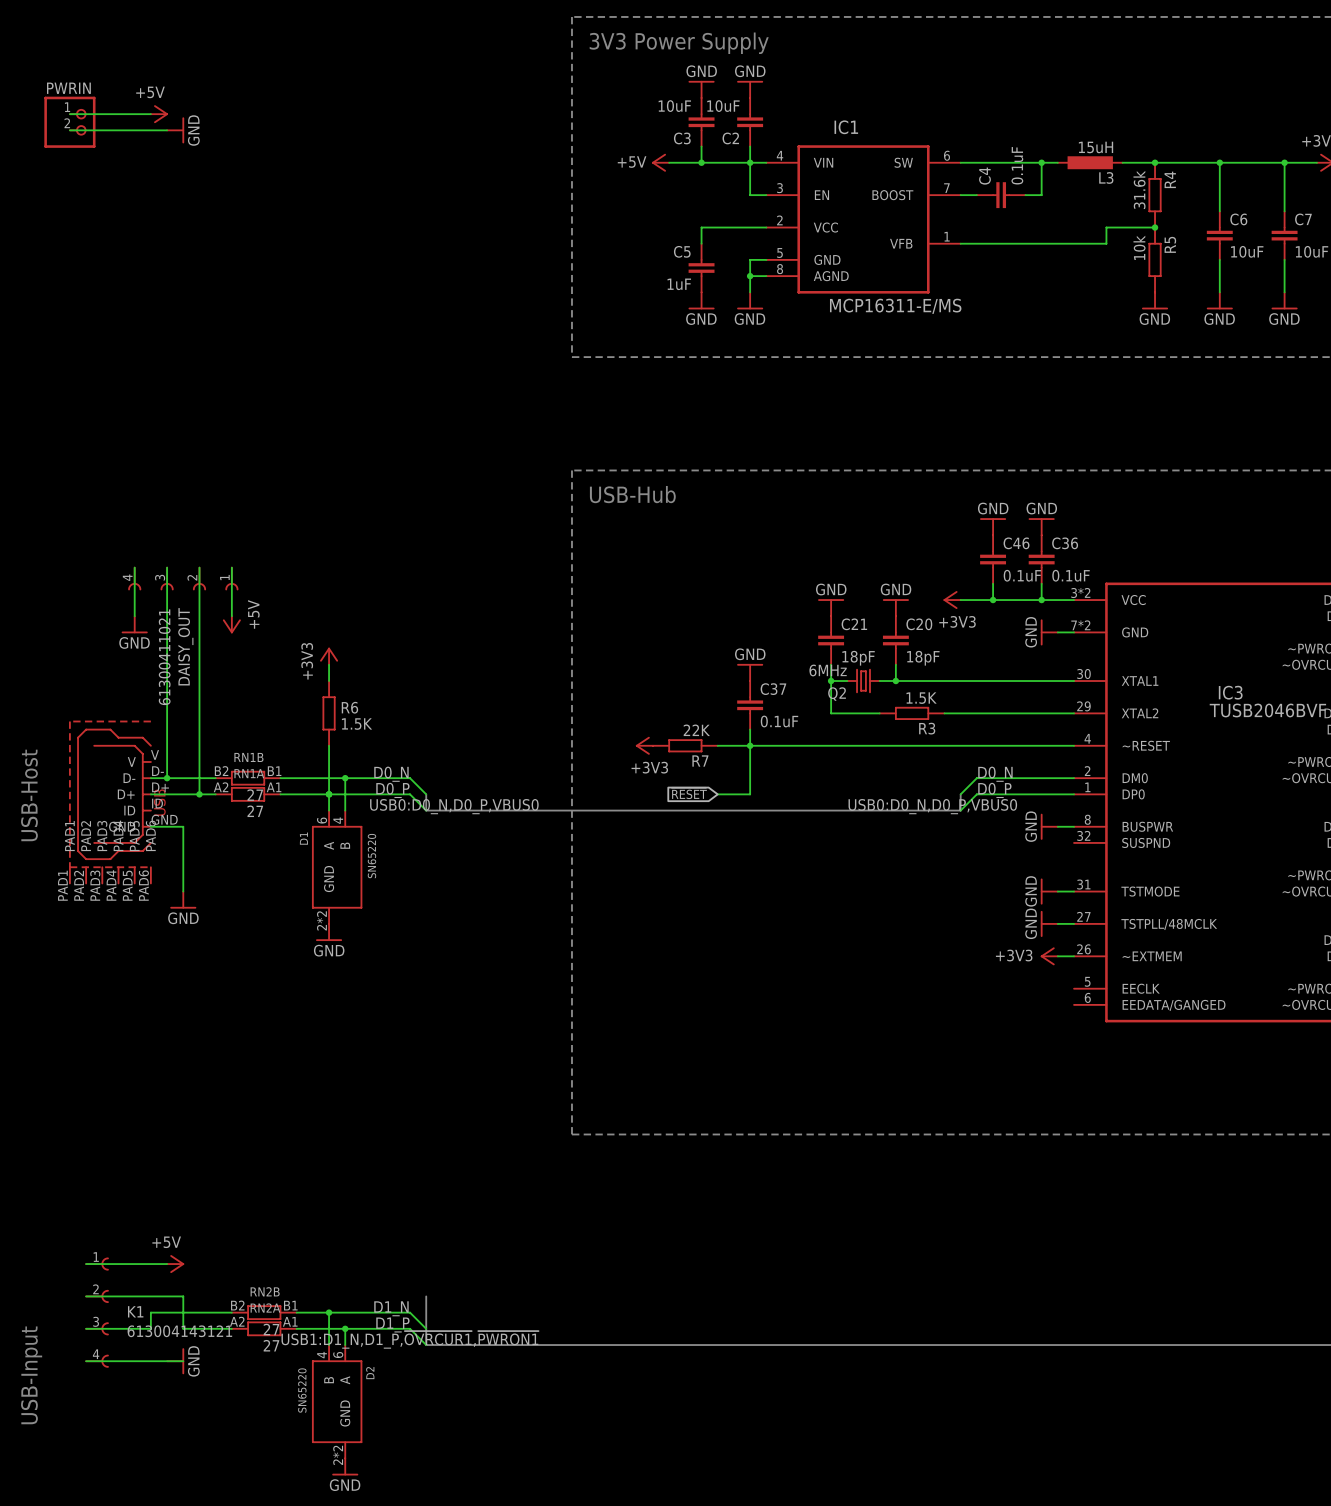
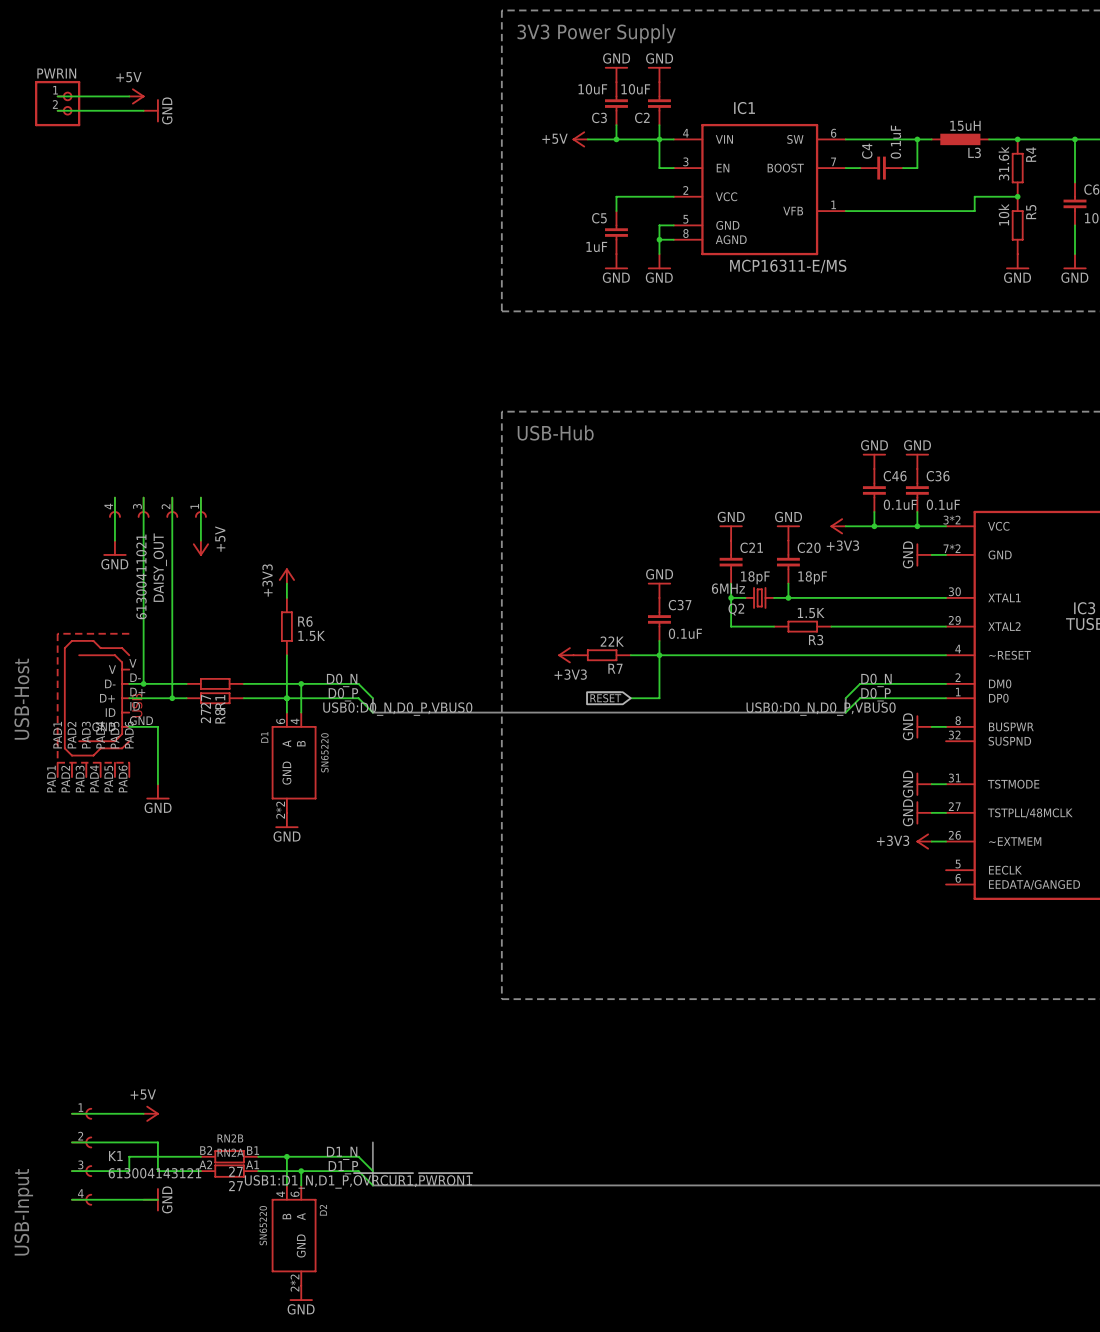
RN1B: 27 (248, 778) -> none
R1: none -> 27 (215, 683)
RN1A: 27 (248, 794) -> none
R8: none -> 27 (215, 698)

